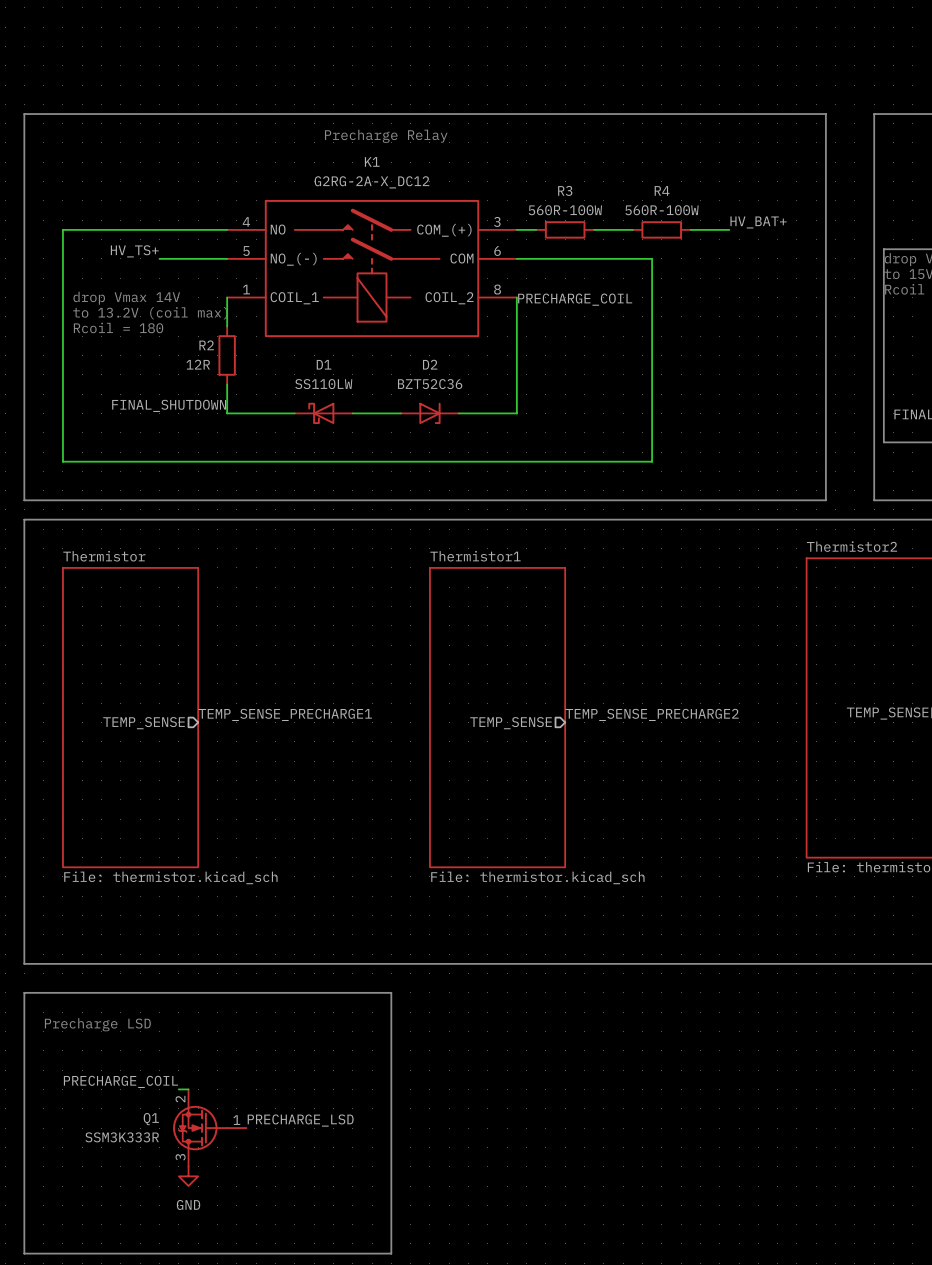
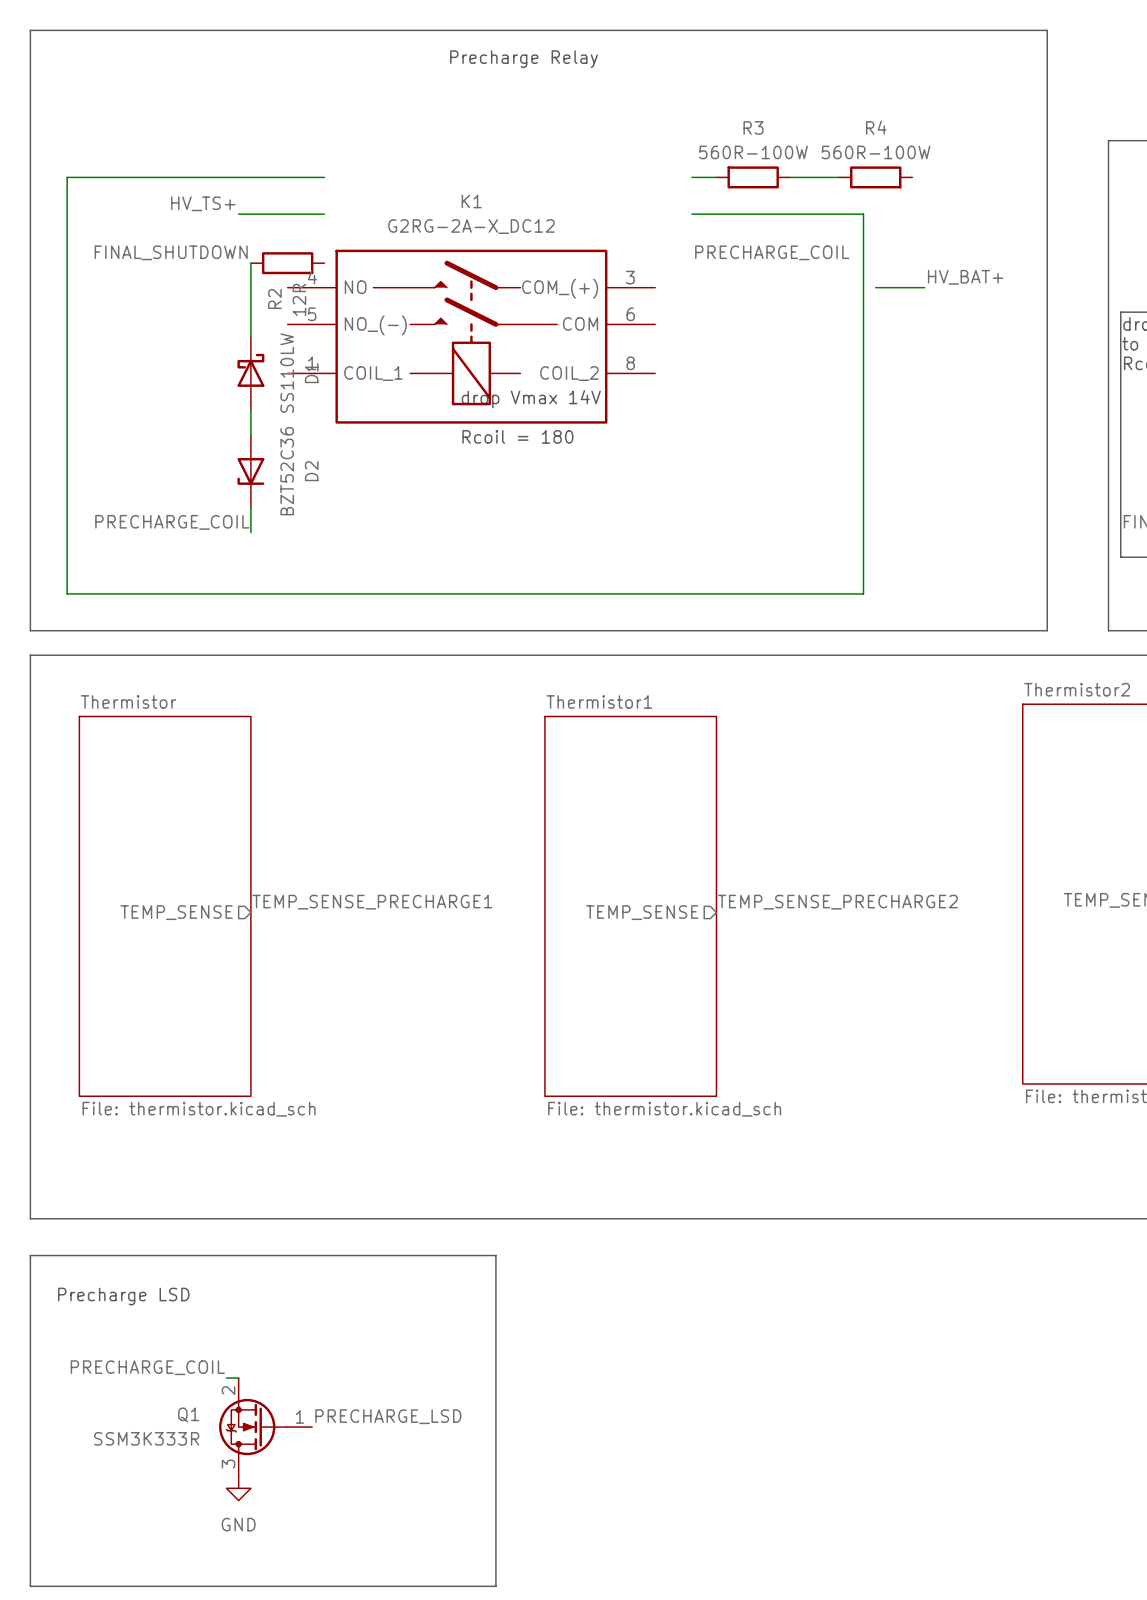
line: (24, 114) (825, 114) -> (30, 140) (30, 30) (1047, 30) (1047, 140)
text position: Precharge Relay (386, 136) -> Precharge Relay (524, 59)
wire: none -> (324, 177) (67, 177) (67, 593) (863, 593) (863, 214) (691, 214)
label: none -> FINAL_SHUTDOWN (171, 252)
wire: none -> (250, 263) (250, 336)
wire: (227, 229) (62, 229) (62, 461) (652, 461) (652, 258) (516, 258) -> none
wire: (516, 229) (536, 229) -> (691, 177) (716, 177)
R3 position: (565, 229) -> (753, 177)
wire: (594, 229) (632, 229) -> (789, 177) (838, 177)
R4 position: (661, 229) -> (875, 177)
label position: HV_TS+ (134, 251) -> HV_TS+ (203, 203)
wire: (159, 258) (227, 258) -> (238, 214) (324, 214)
wire: (227, 297) (227, 326) -> none
wire: (516, 297) (516, 413) (458, 413) -> none
text: drop Vmax 14V (126, 298) -> none
label position: PRECHARGE_COIL (575, 299) -> PRECHARGE_COIL (772, 252)
text: to 13.2V (coil max) (150, 313) -> none
text: none -> drop Vmax 14V (531, 399)
wire: none -> (250, 410) (250, 434)
text: Rcoil = 180 (118, 327) -> none
R2 name position: R2 (206, 345) -> R2 (274, 298)
text: none -> Rcoil = 180 (517, 436)
R2 rotation: 0° (227, 355) -> 90° clockwise (287, 263)
R2 position: (227, 355) -> (287, 263)
R2 value position: 12R (198, 364) -> 12R (299, 299)
wire: (227, 384) (227, 413) (294, 413) -> none
wire: none -> (250, 508) (250, 532)
label: FINAL_SHUTDOWN (169, 405) -> none
D1 rotation: 0° (321, 413) -> 90° clockwise (250, 370)
D1 position: (323, 413) -> (250, 373)
wire: (352, 413) (400, 413) -> none
D2 rotation: 0° (429, 413) -> 90° clockwise (250, 471)
D2 position: (429, 413) -> (250, 471)
label: none -> PRECHARGE_COIL (172, 522)

